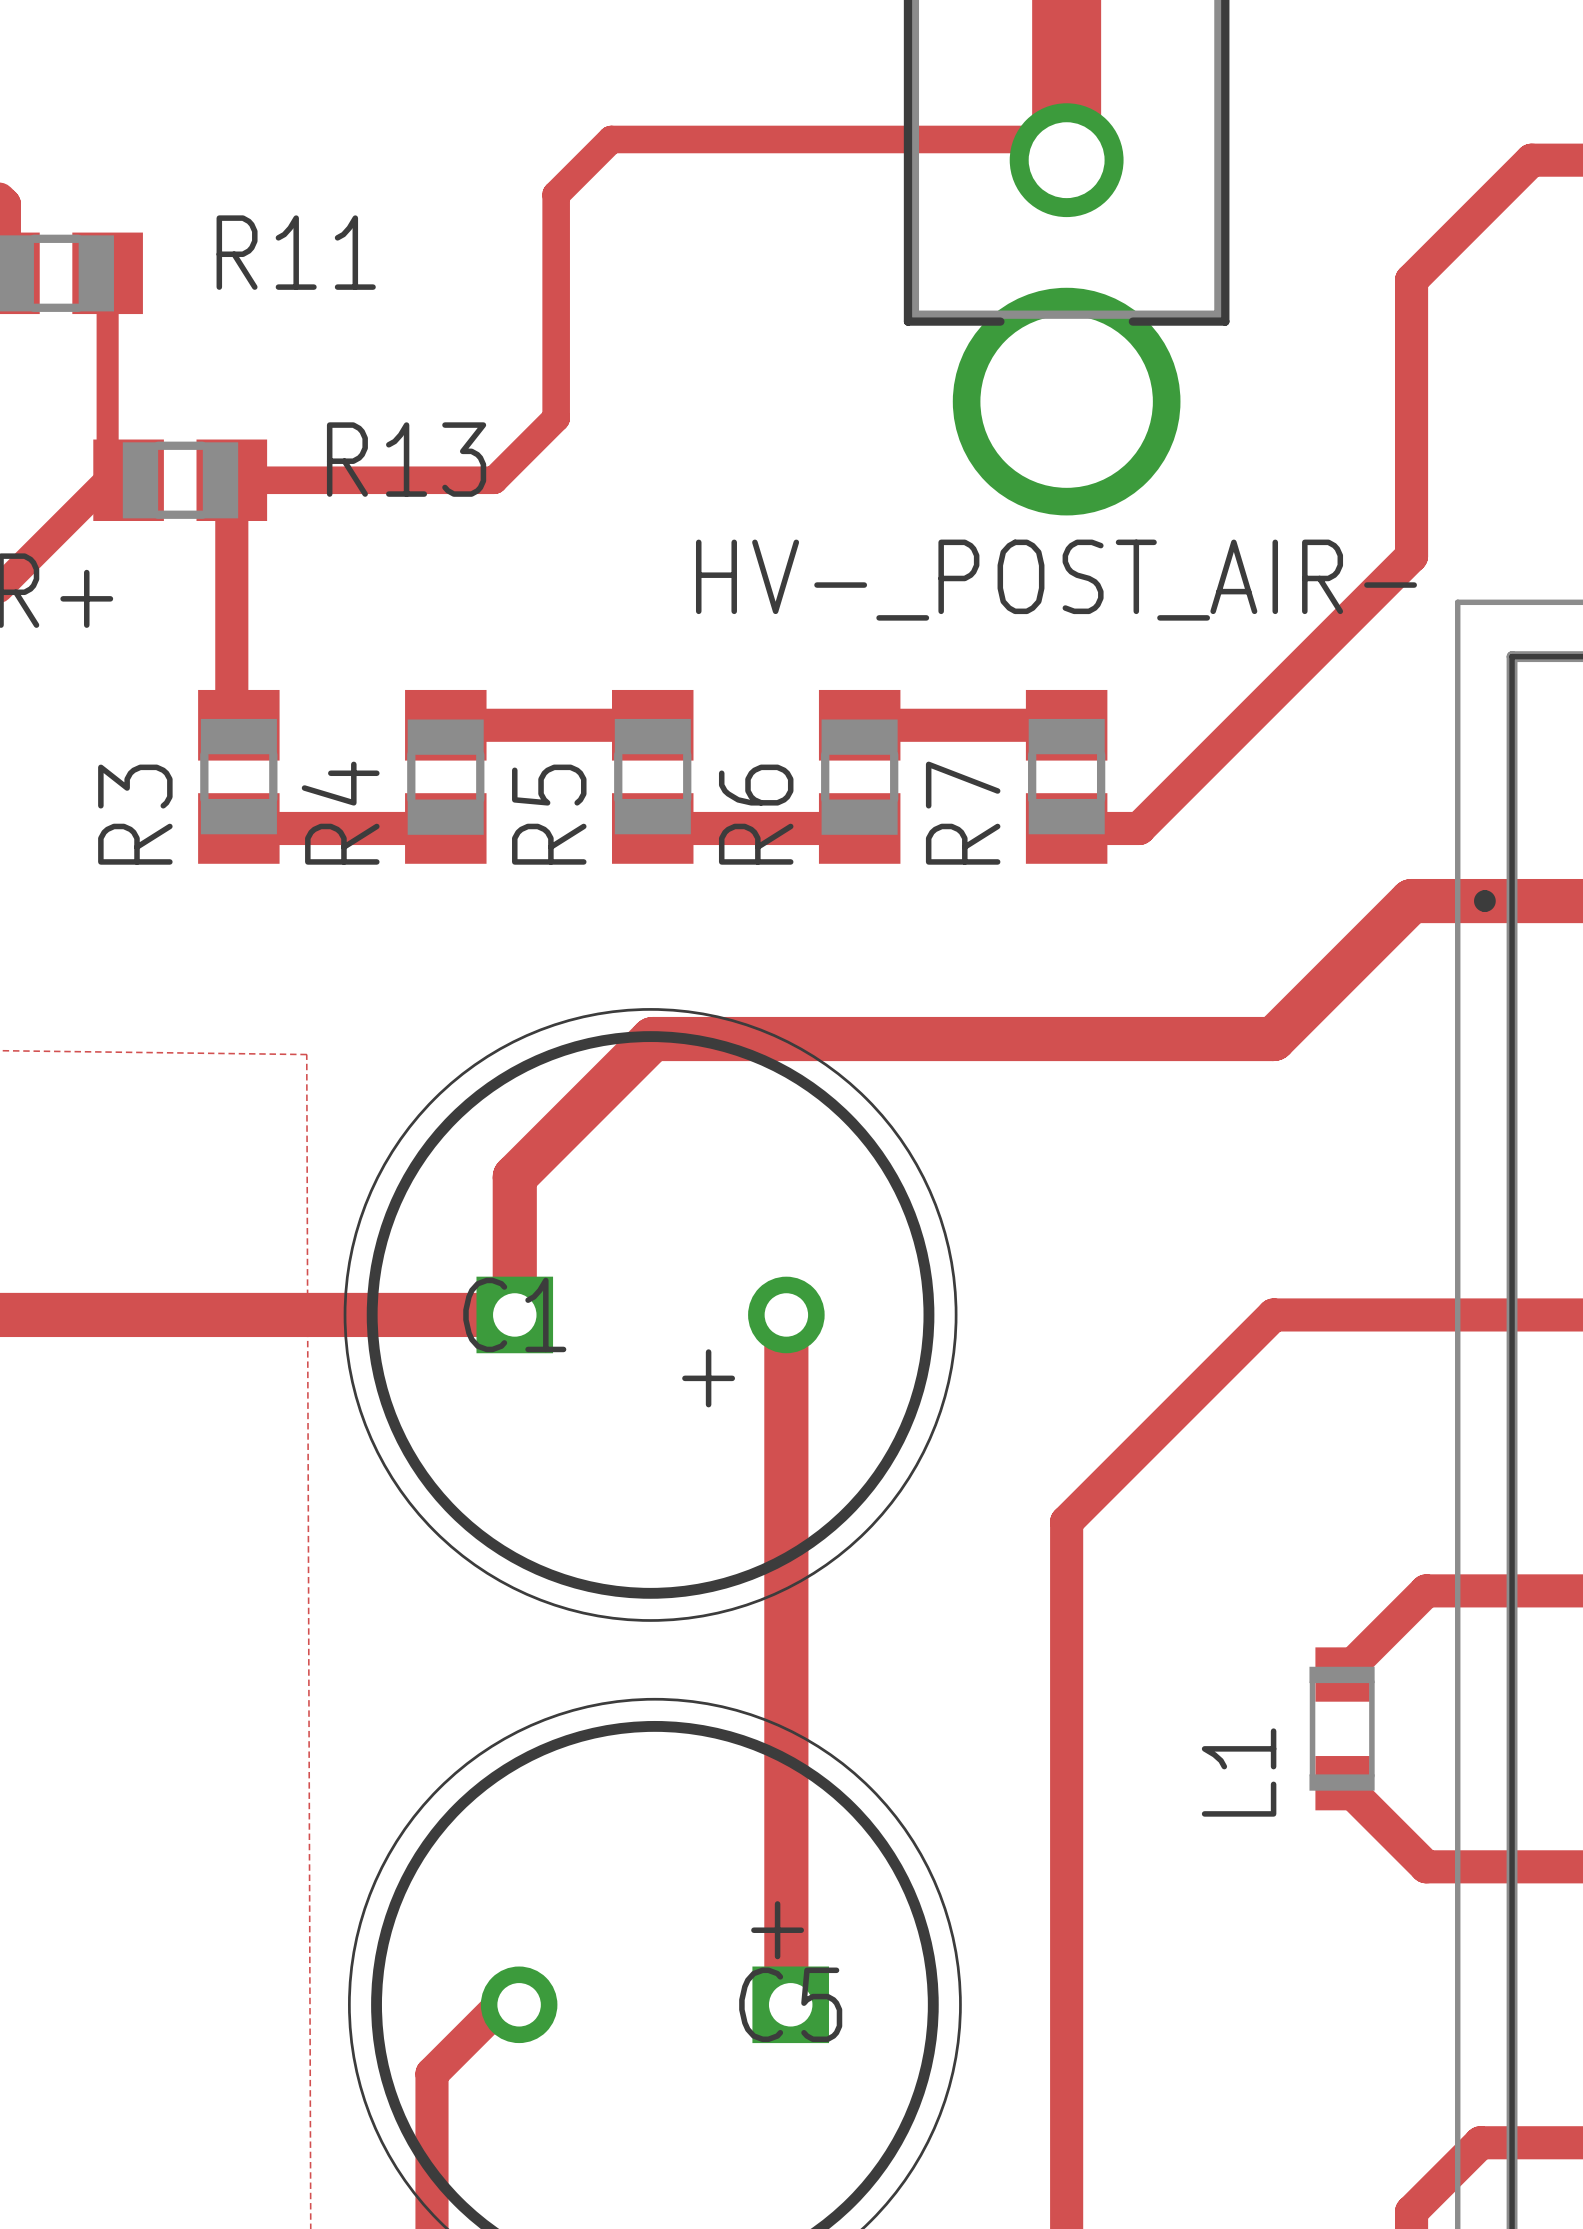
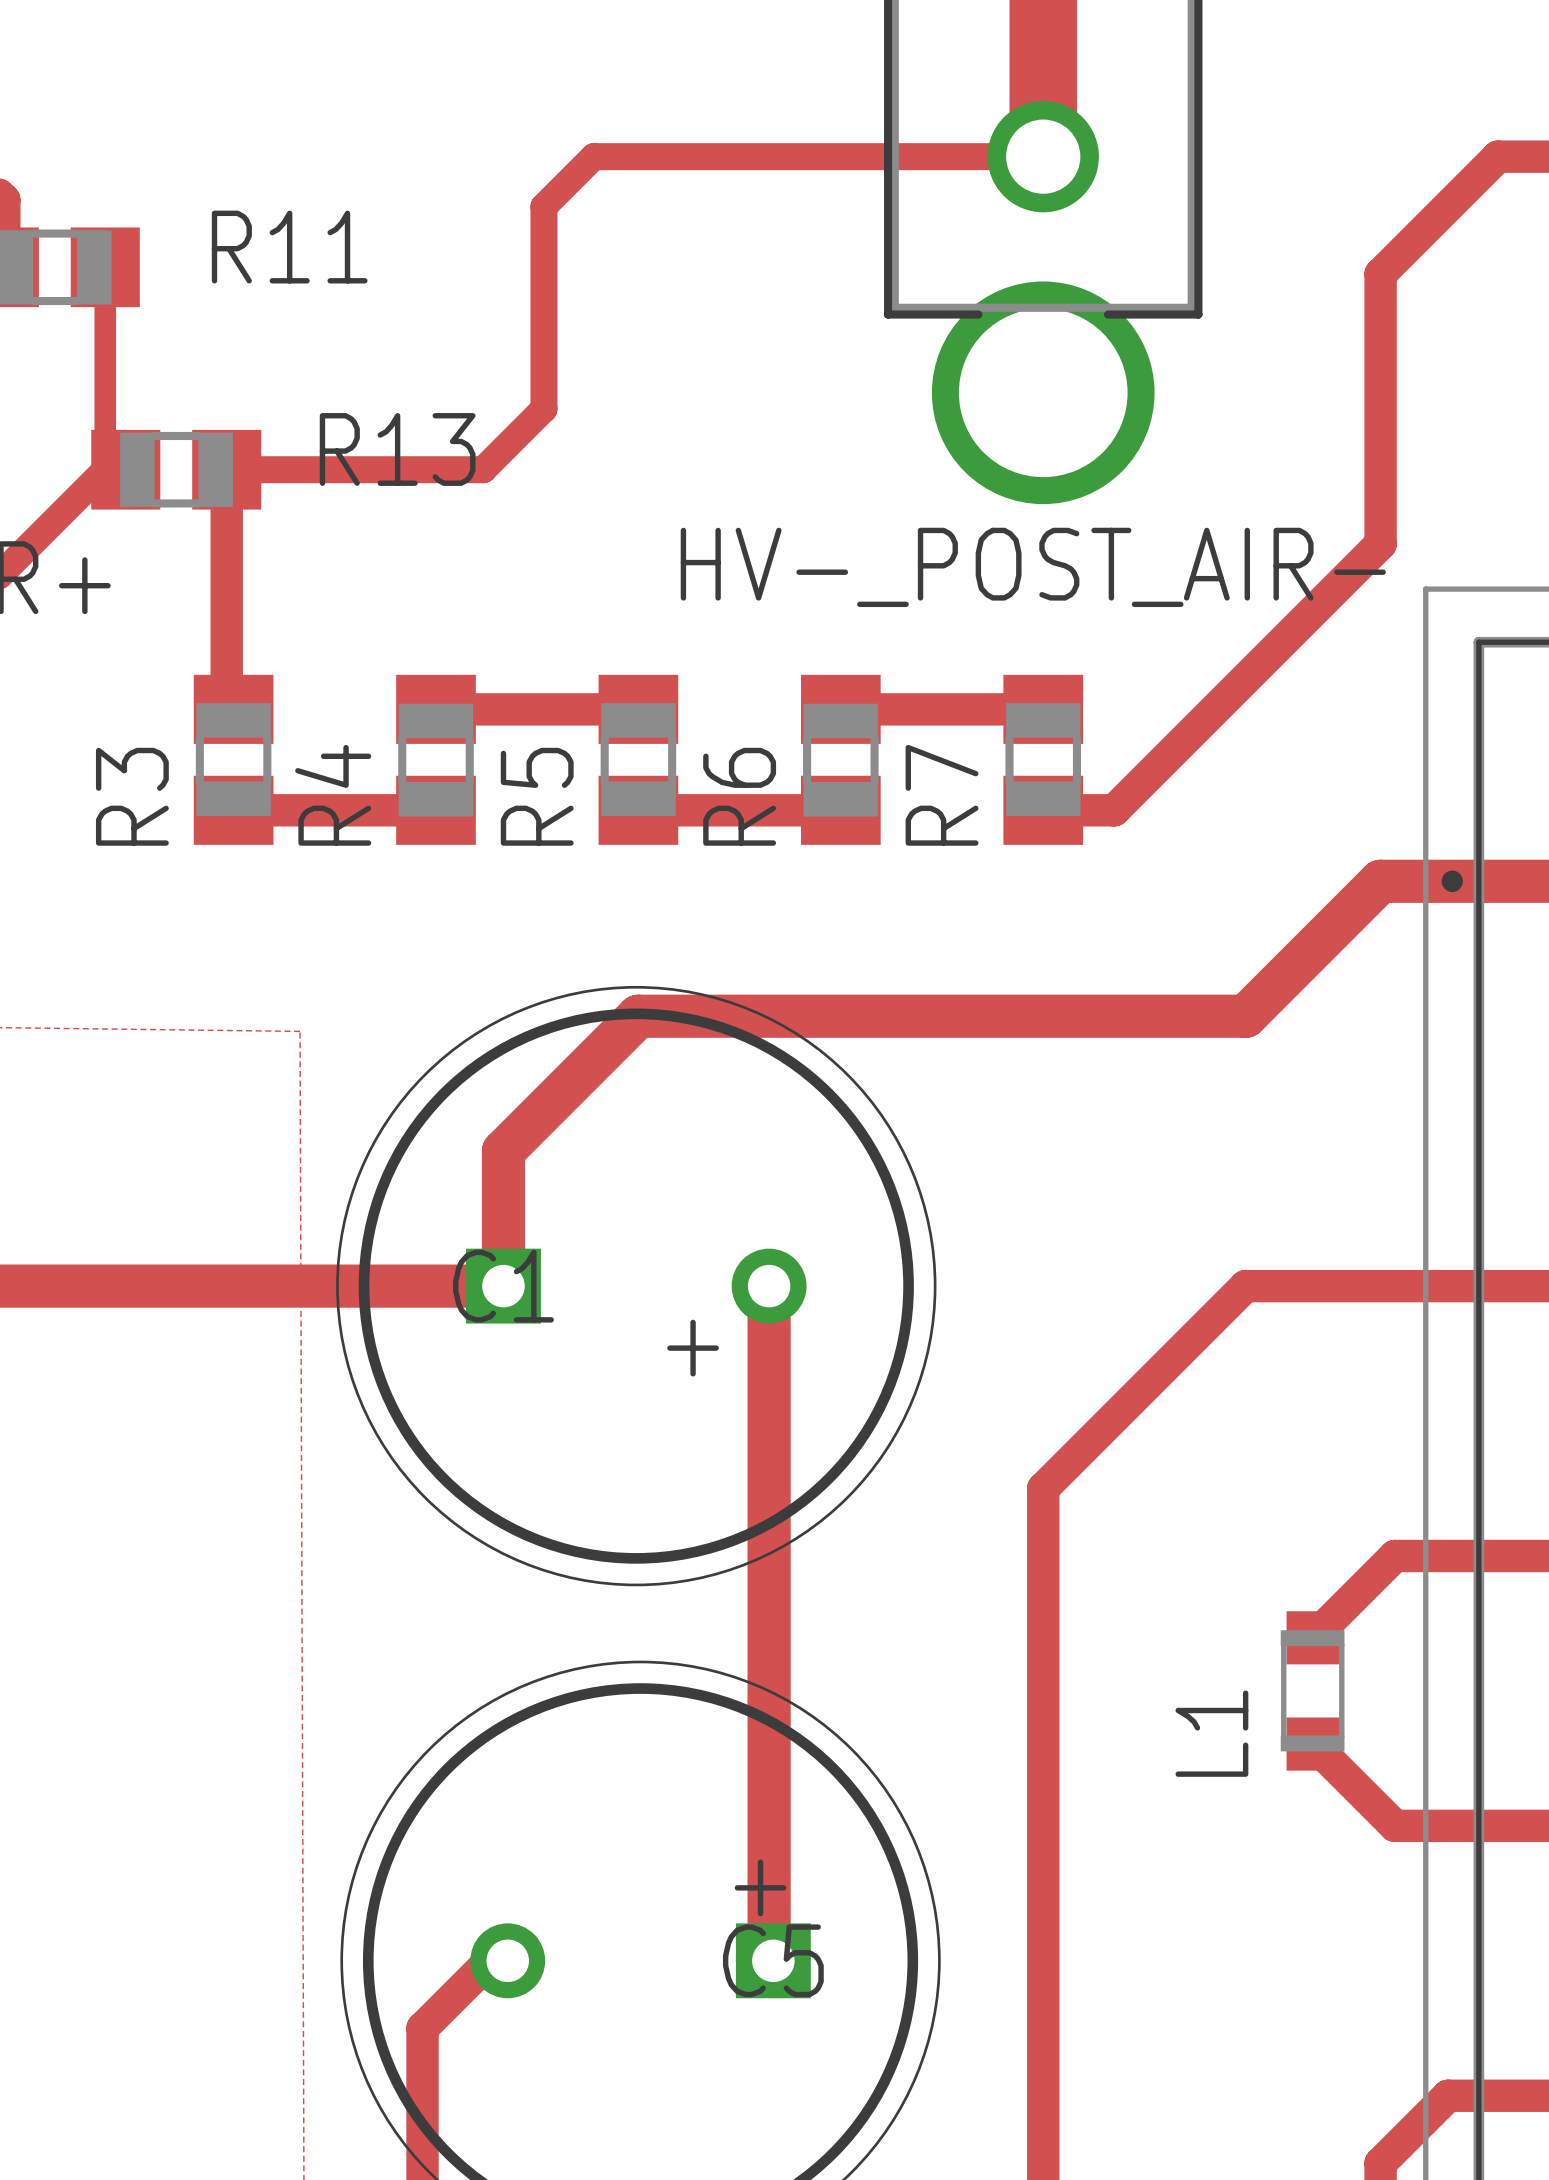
top track: (1066, 160) (1045, 139) (611, 139) (556, 194) (556, 211) -> (1043, 156) (593, 156) (543, 206)

